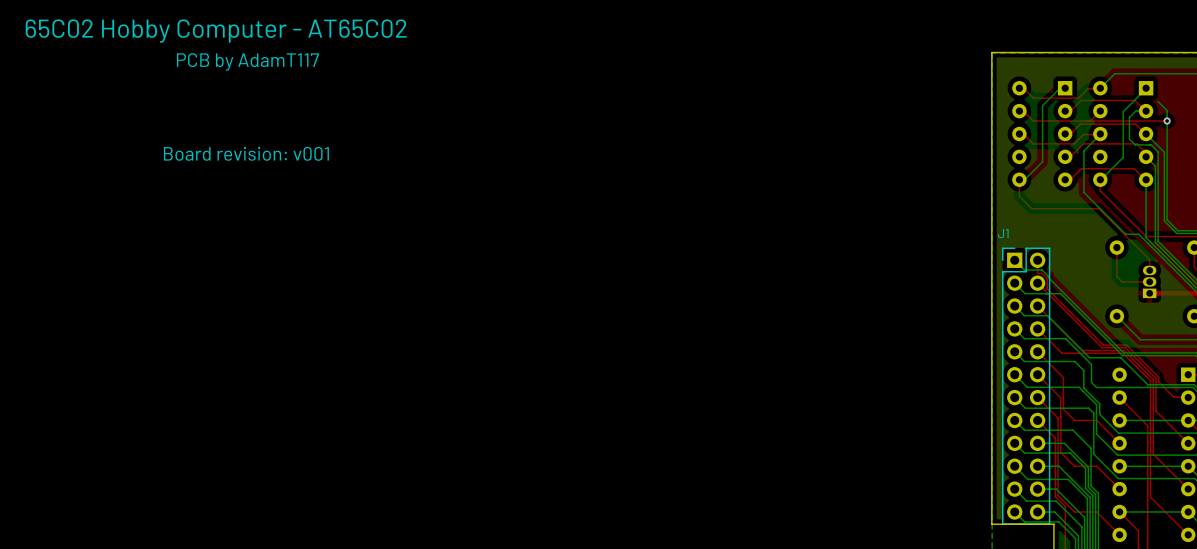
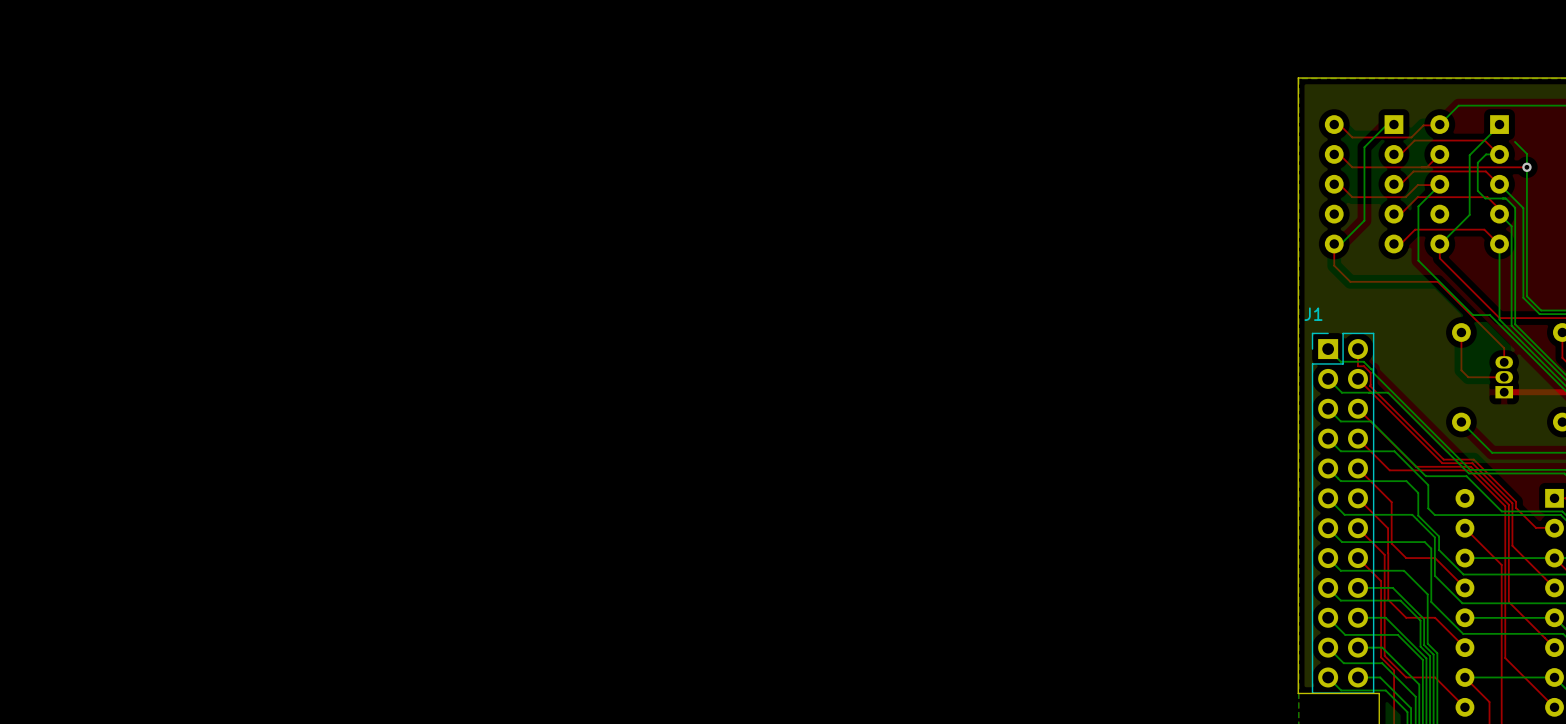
text: 65C02 Hobby Computer - AT65C02 (216, 31) -> none
text: PCB by AdamT117 (247, 61) -> none
text: Board revision: v001 (246, 153) -> none

